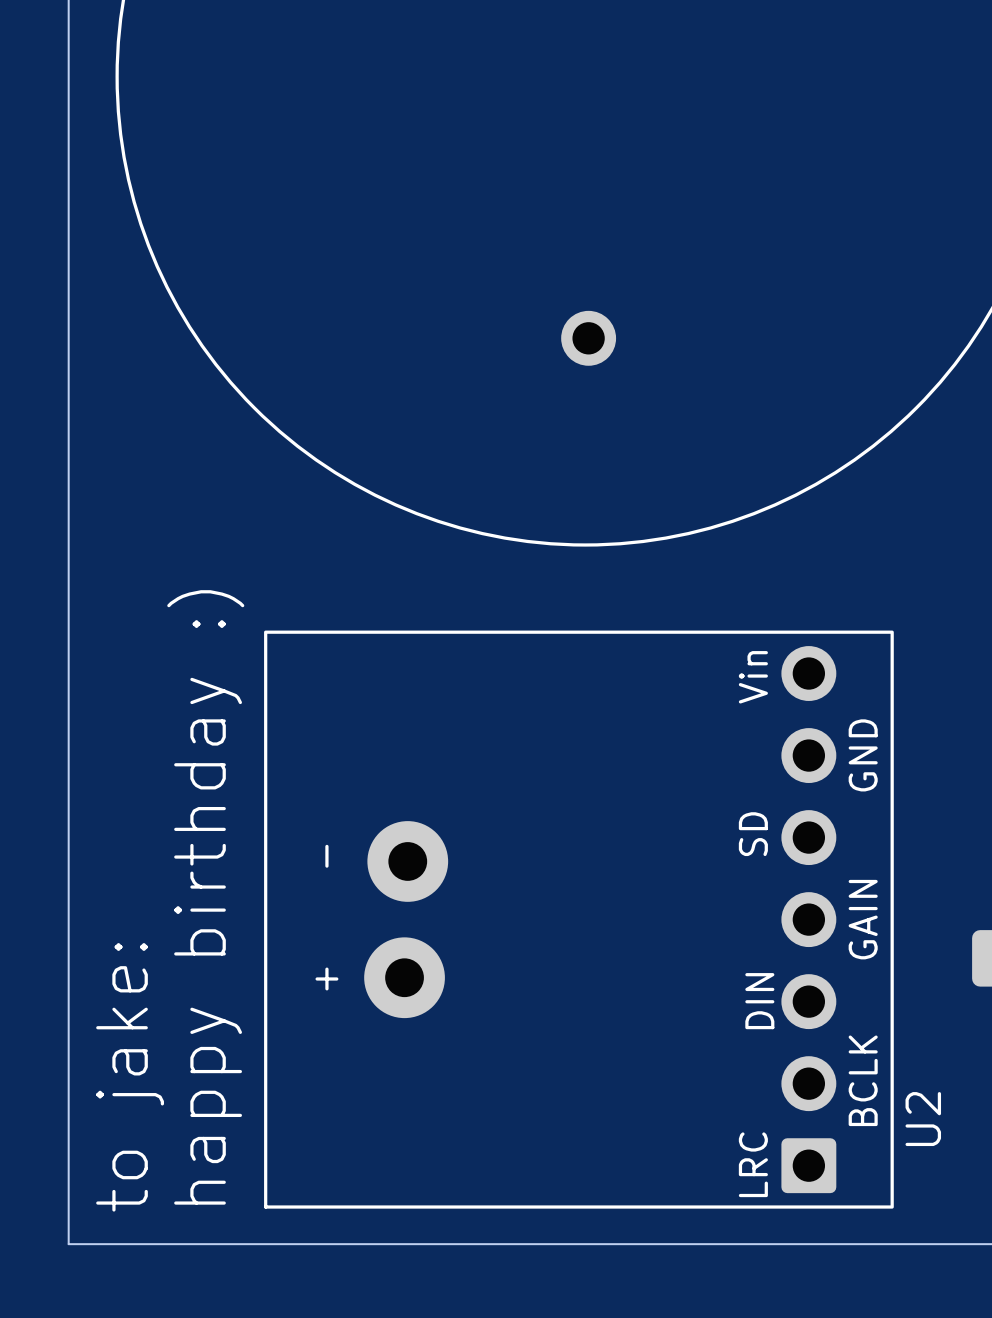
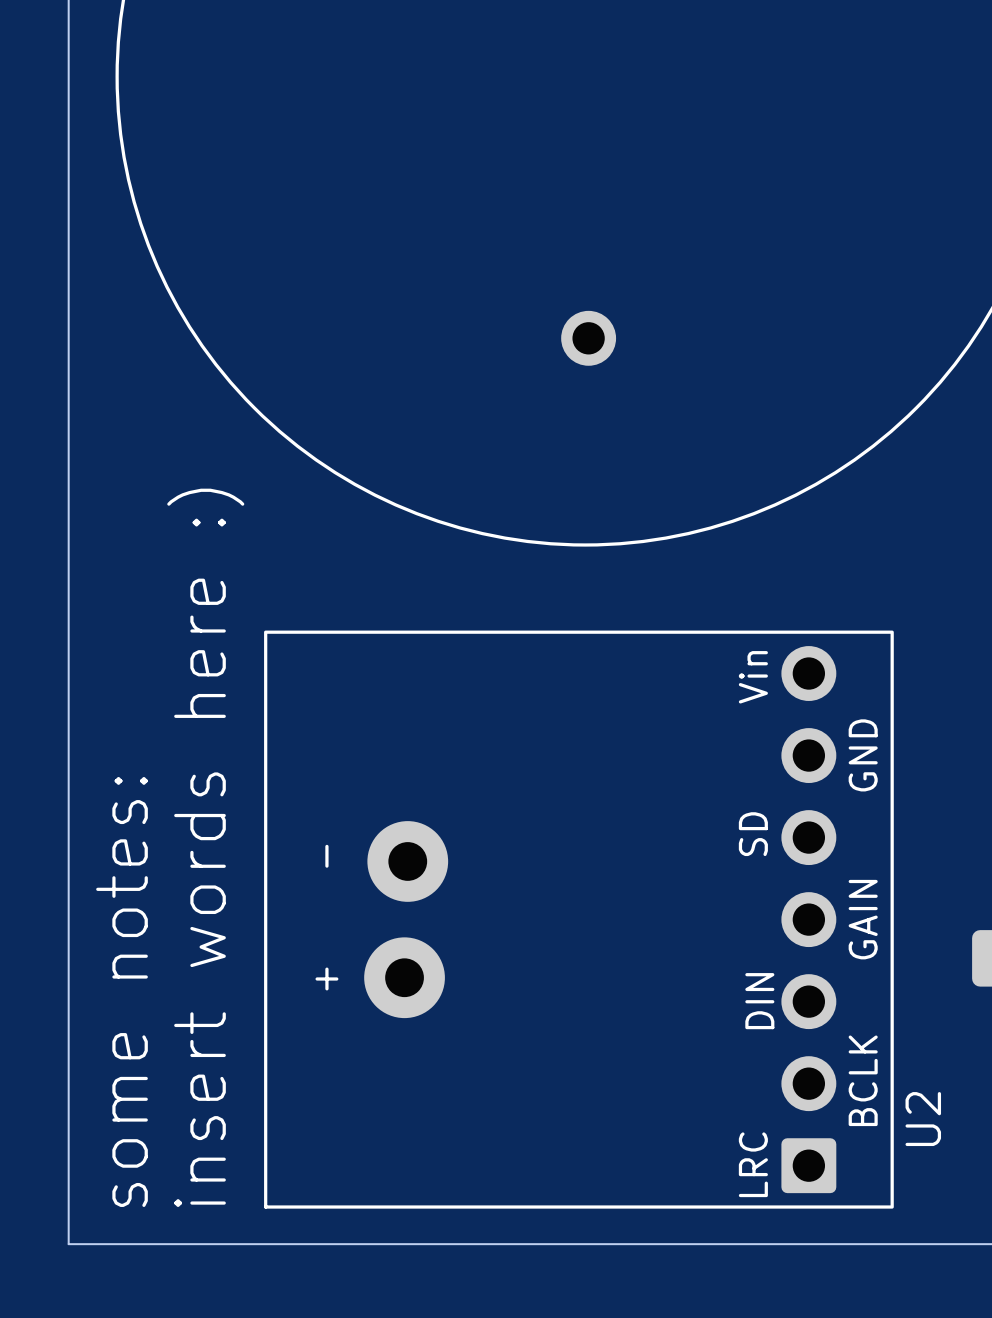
text: happy birthday :) (205, 897) -> insert words here :) (205, 847)
text: to jake: (130, 1077) -> some notes: (122, 991)

